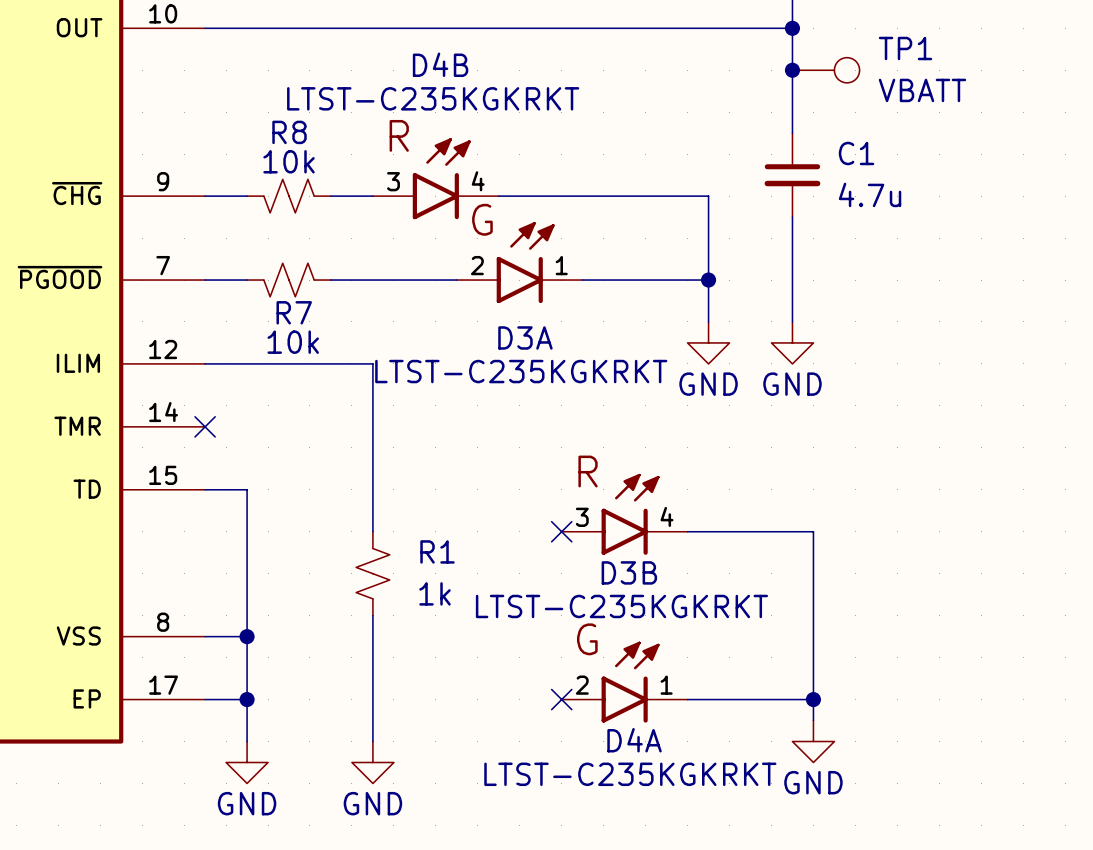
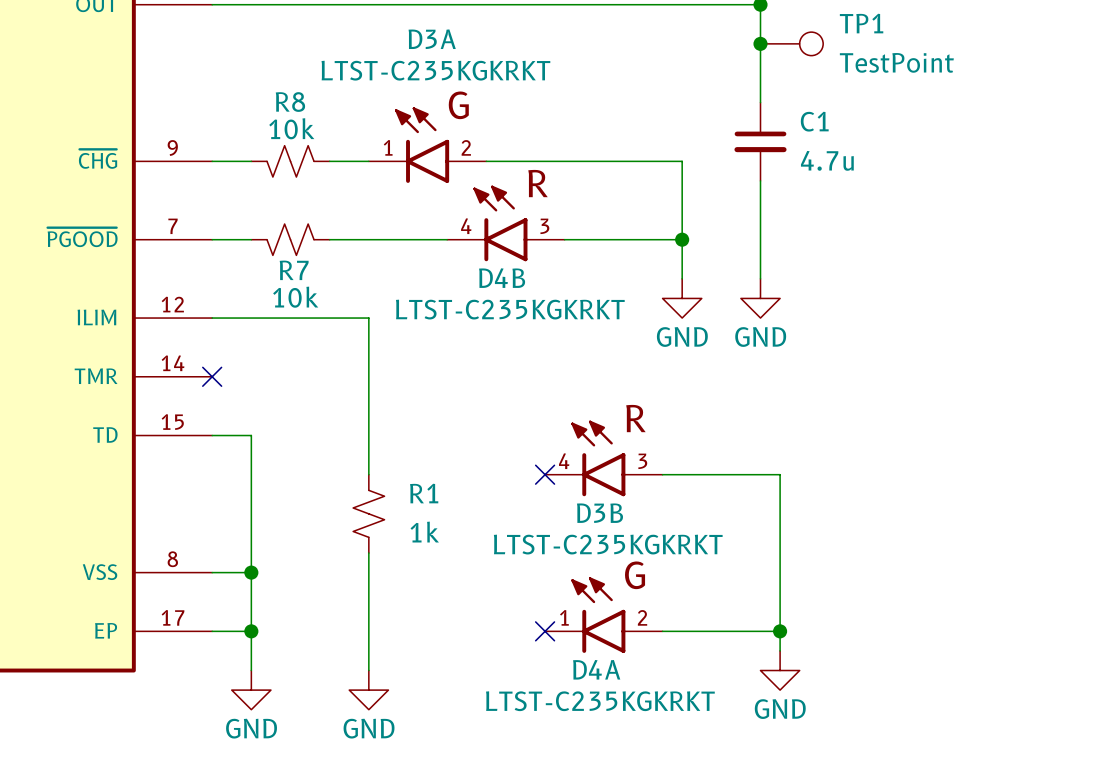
D4B name position: D4B (440, 64) -> D4B (502, 278)
TP1 value: VBATT (922, 90) -> TestPoint (896, 62)
D4B value position: LTST-C235KGKRKT (433, 98) -> LTST-C235KGKRKT (510, 309)
D4B position: (435, 178) -> (505, 223)
D4B flip: as is (441, 178) -> left-right (500, 223)
D3A position: (519, 262) -> (427, 145)
D3A flip: as is (525, 262) -> left-right (422, 145)
D3A name position: D3A (525, 337) -> D3A (432, 39)
D3A value position: LTST-C235KGKRKT (521, 371) -> LTST-C235KGKRKT (435, 70)
D3B flip: as is (630, 514) -> left-right (598, 458)
D4A flip: as is (630, 682) -> left-right (598, 615)

